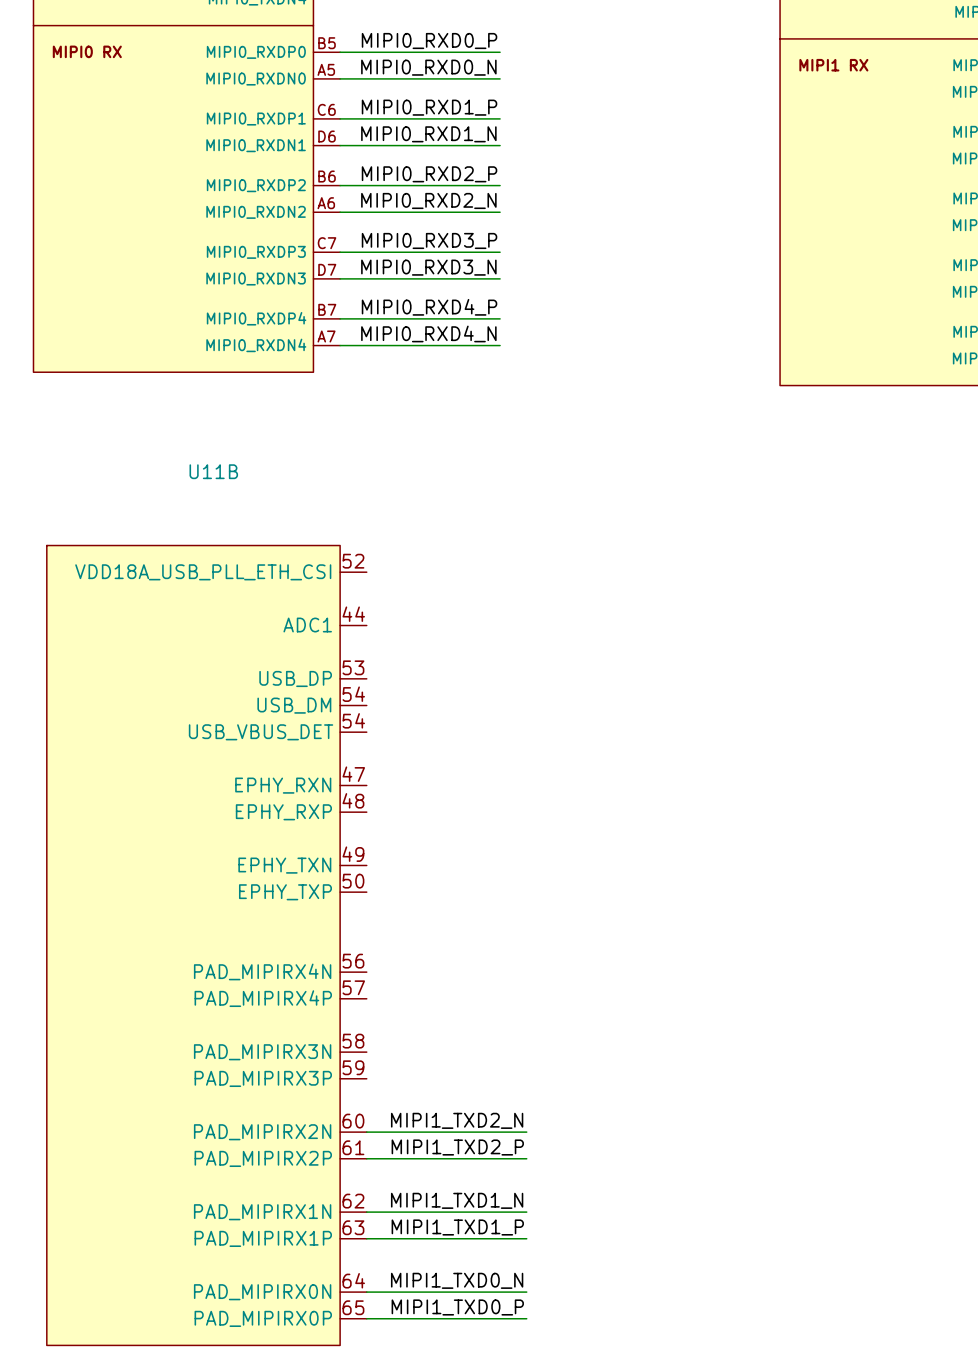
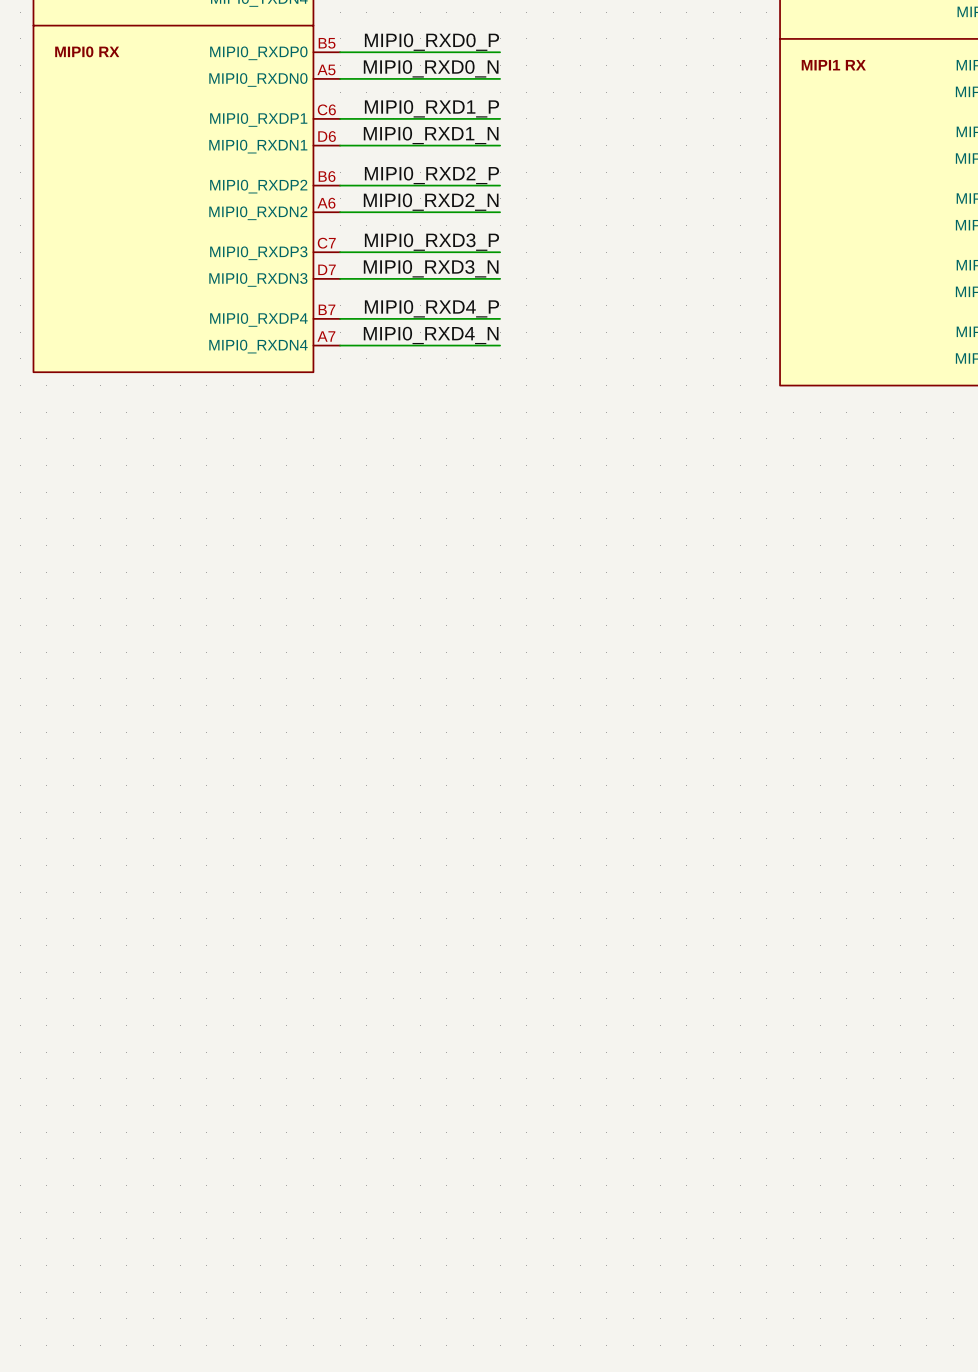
U11B: (206, 945) -> none
label: MIPI1_TXD2_N (457, 1120) -> none
wire: (366, 1132) (526, 1132) -> none
label: MIPI1_TXD2_P (457, 1147) -> none
wire: (366, 1158) (526, 1158) -> none
label: MIPI1_TXD1_N (457, 1200) -> none
wire: (366, 1212) (526, 1212) -> none
label: MIPI1_TXD1_P (457, 1227) -> none
wire: (366, 1238) (526, 1238) -> none
label: MIPI1_TXD0_N (457, 1280) -> none
wire: (366, 1292) (526, 1292) -> none
label: MIPI1_TXD0_P (457, 1307) -> none
wire: (366, 1318) (526, 1318) -> none

